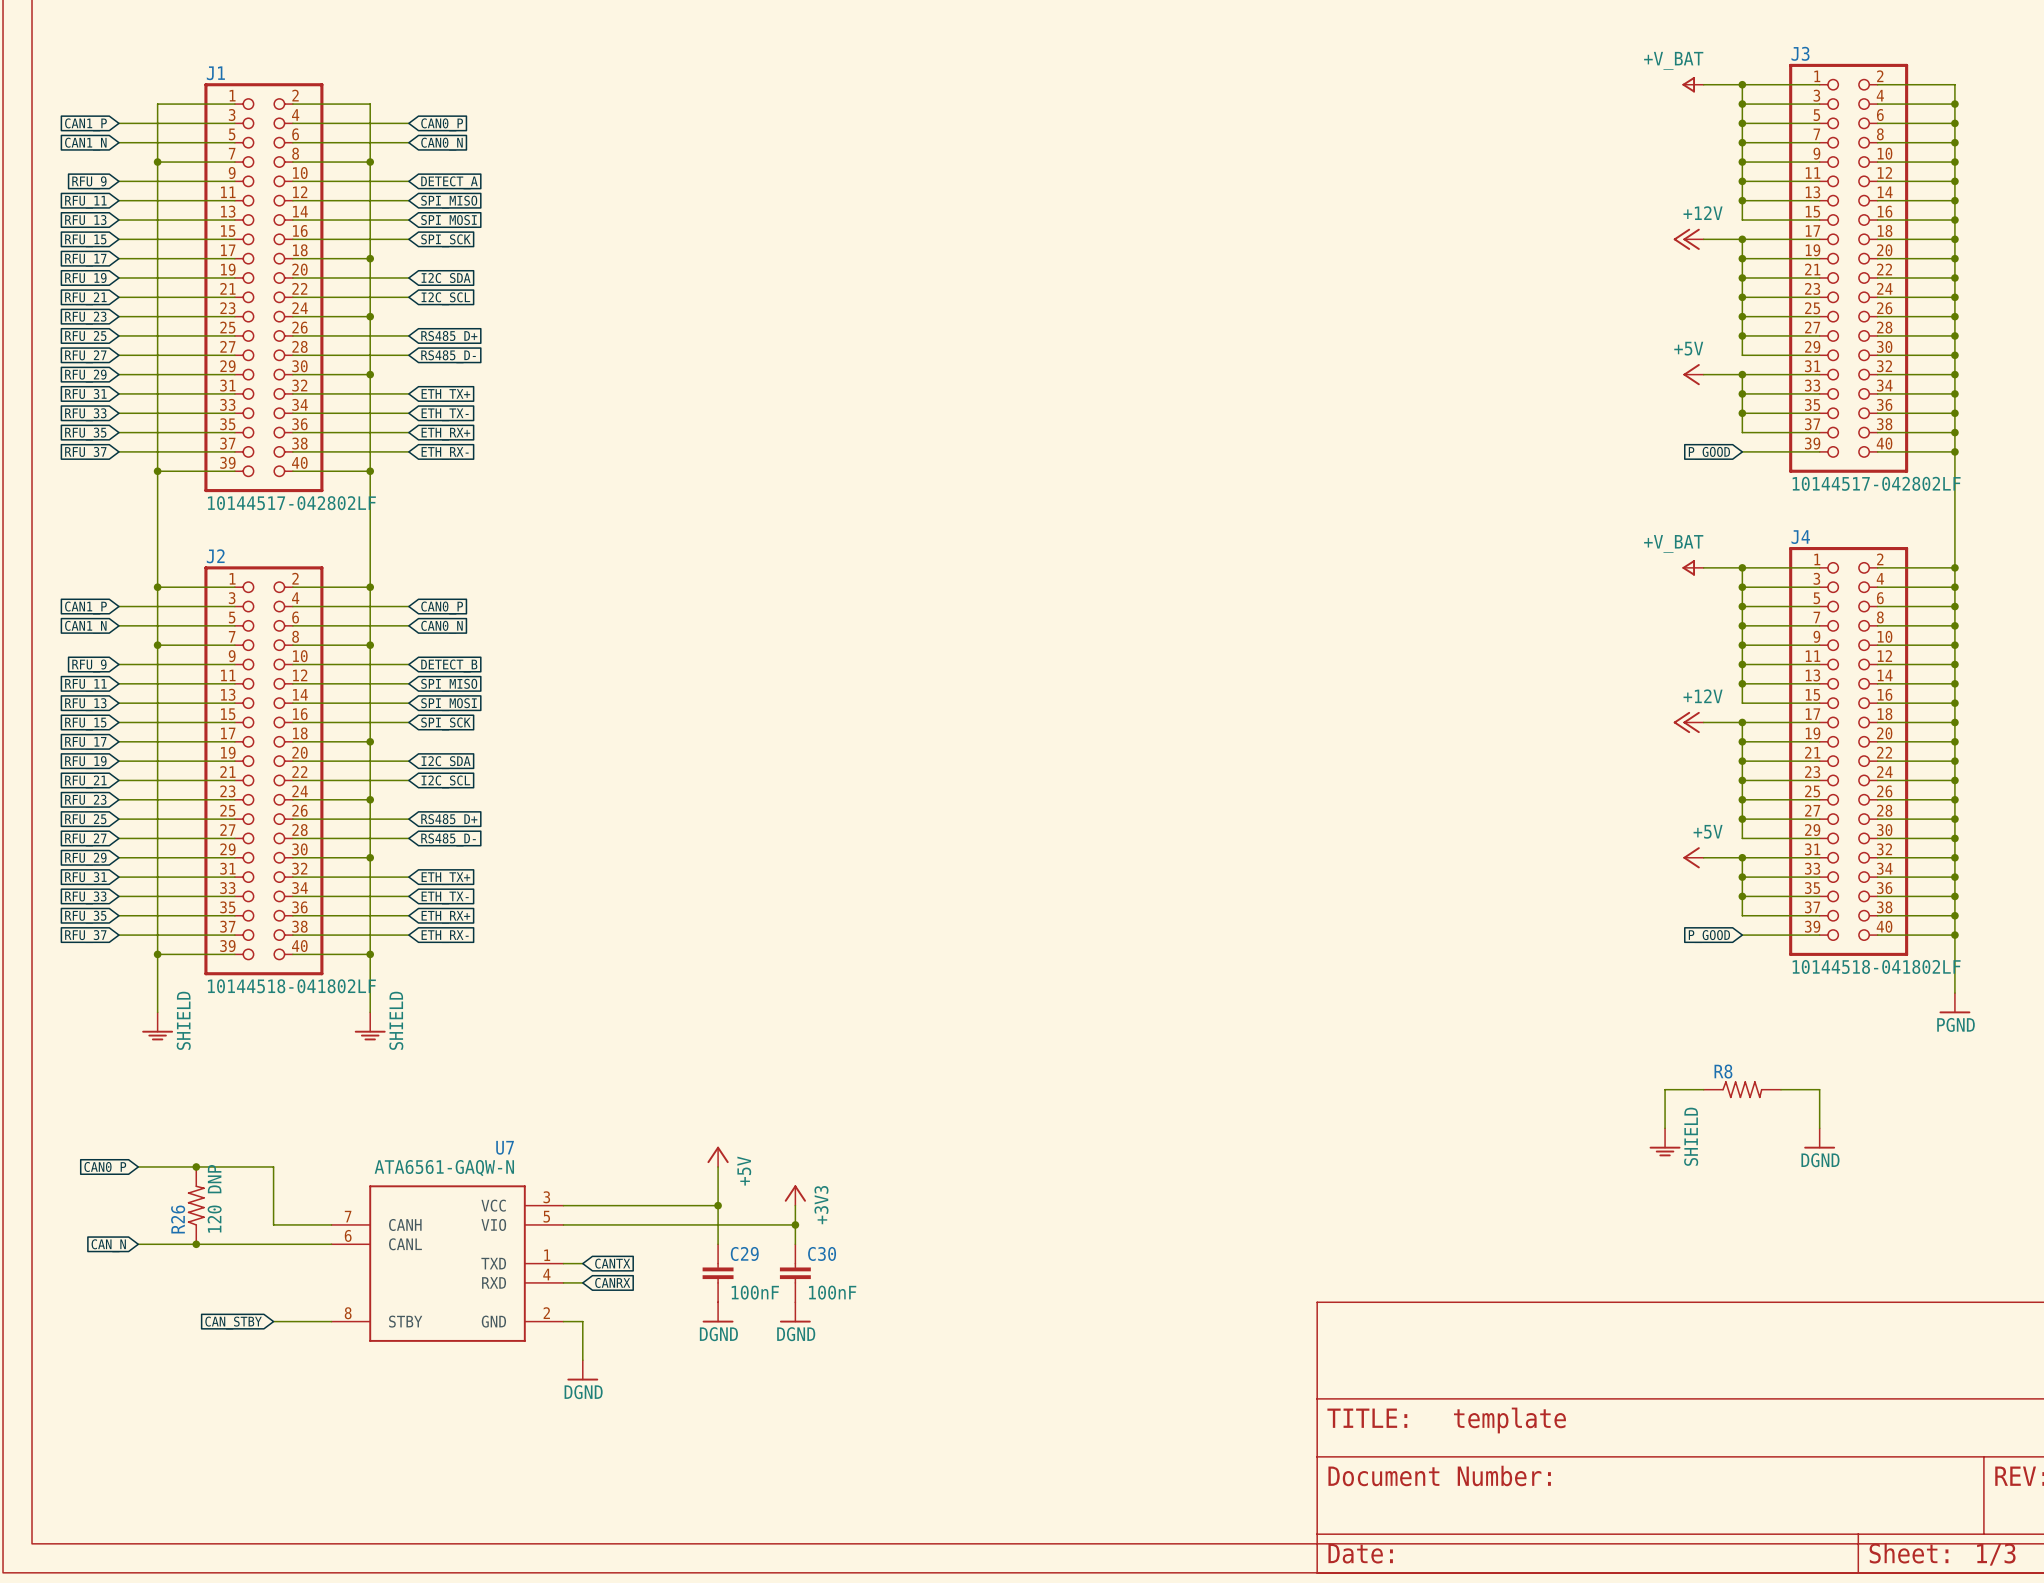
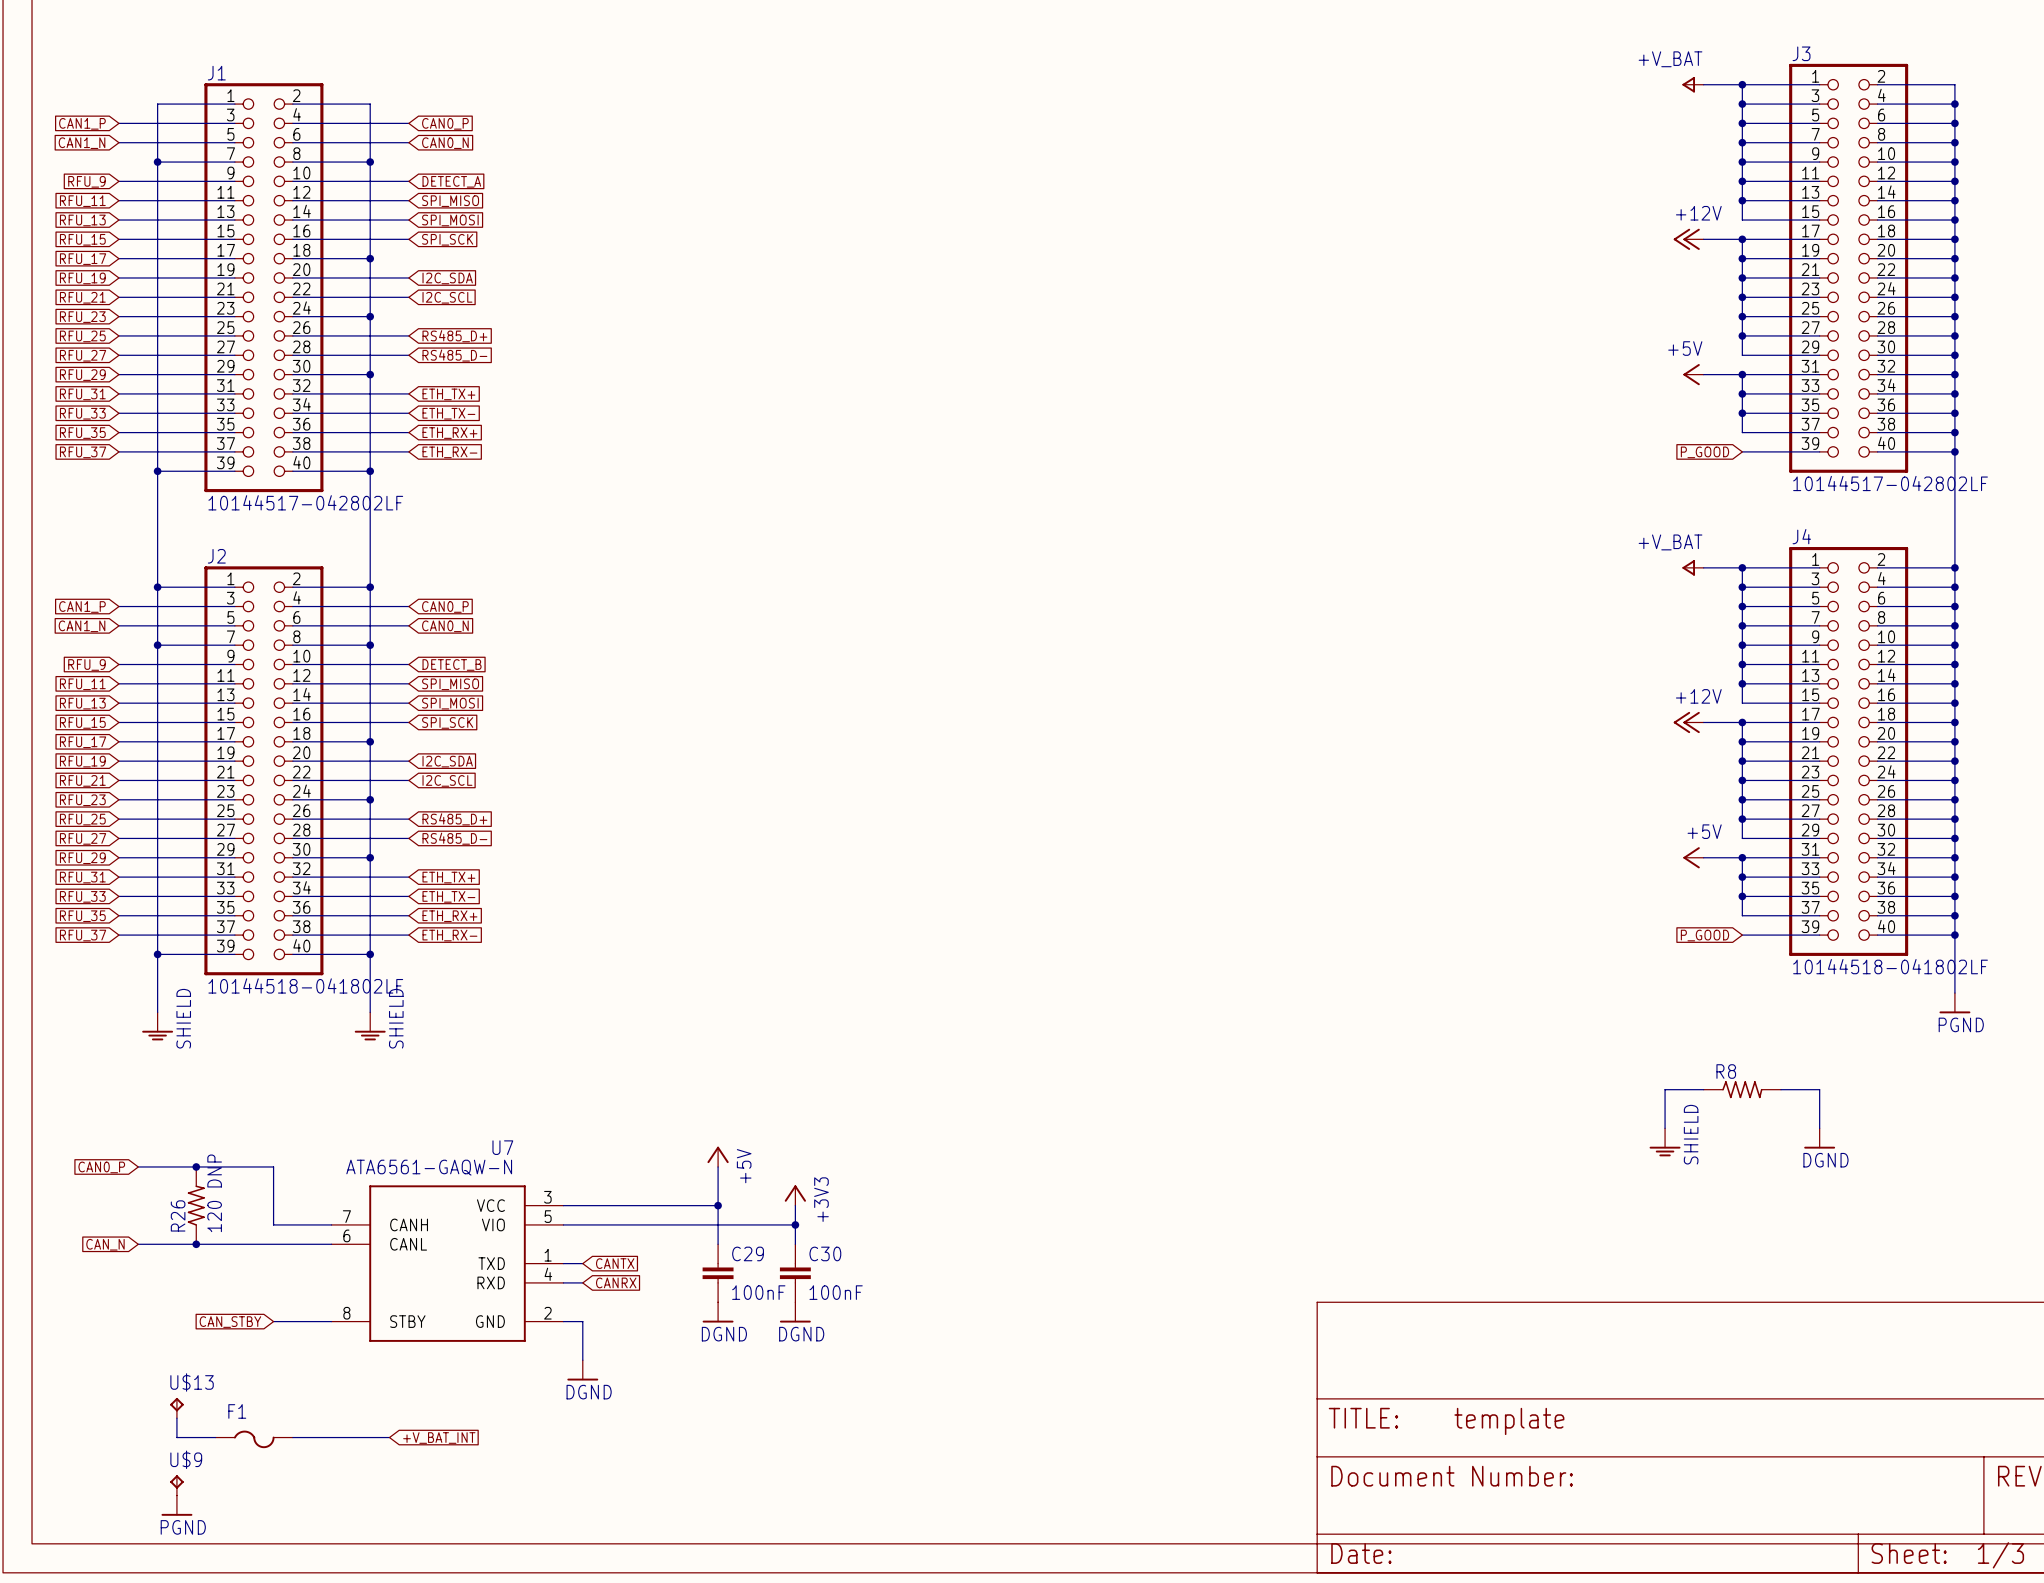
U$13: none -> (176, 1408)
wire: none -> (176, 1418) (176, 1437) (215, 1437)
wire: none -> (292, 1437) (389, 1437)
F1: none -> (254, 1439)
global label: none -> +V_BAT_INT (439, 1438)
U$9: none -> (176, 1485)
power symbol: none -> PGND (176, 1505)

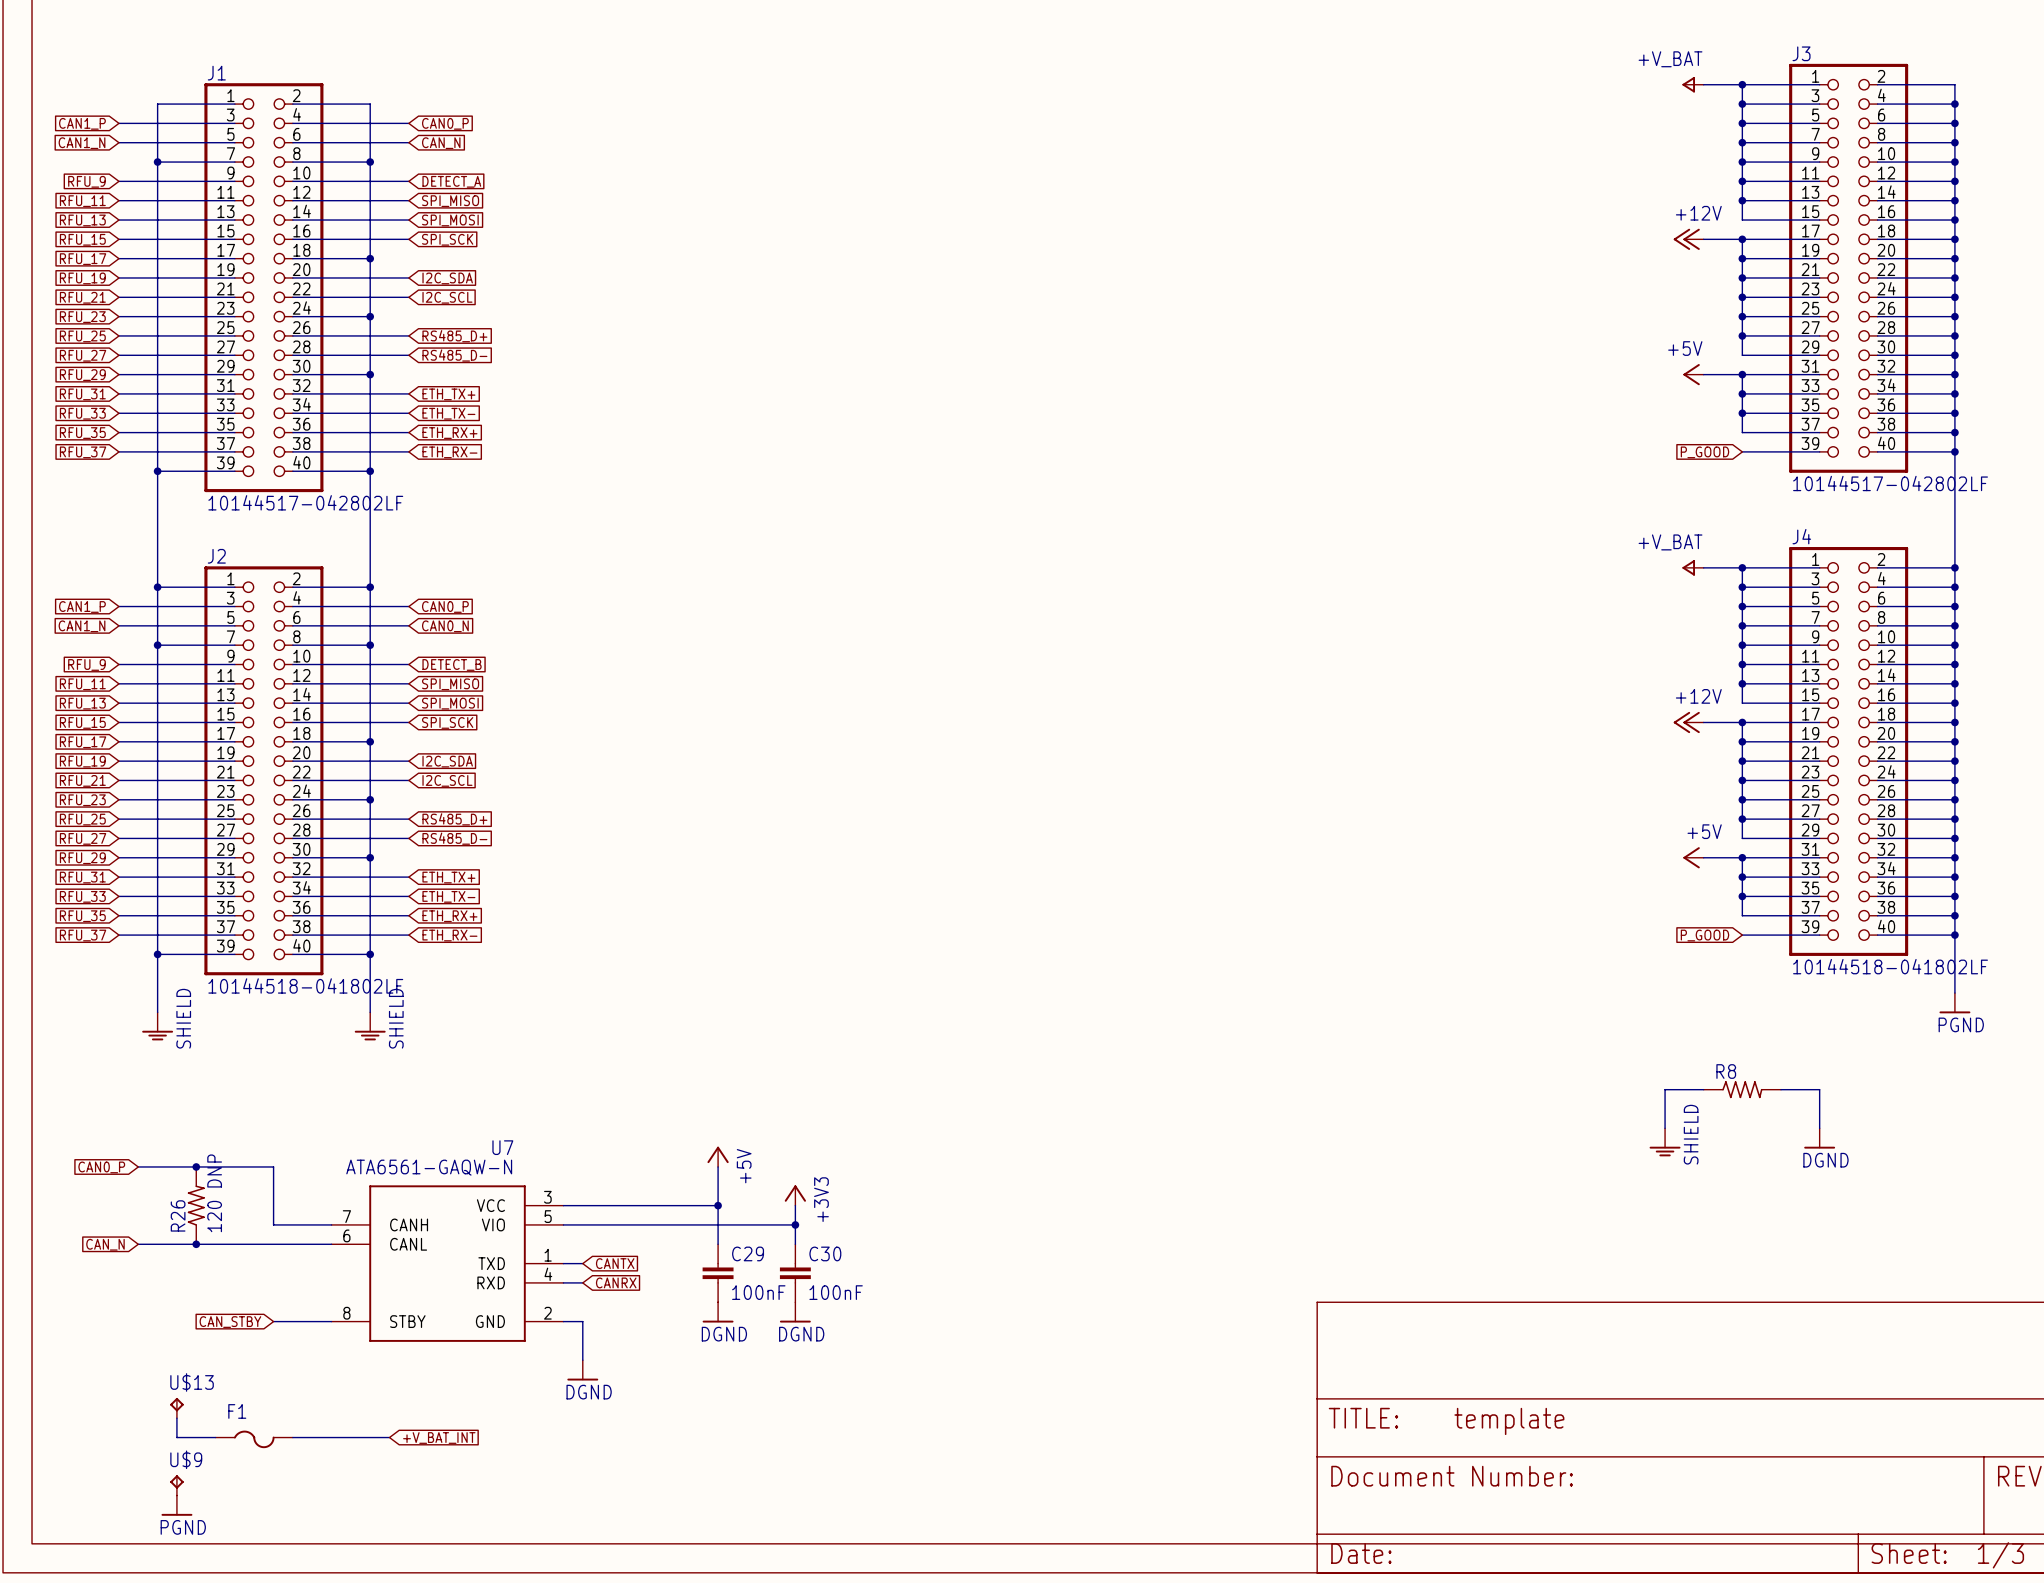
global label: CAN0_N (445, 143) -> CAN_N (441, 143)

